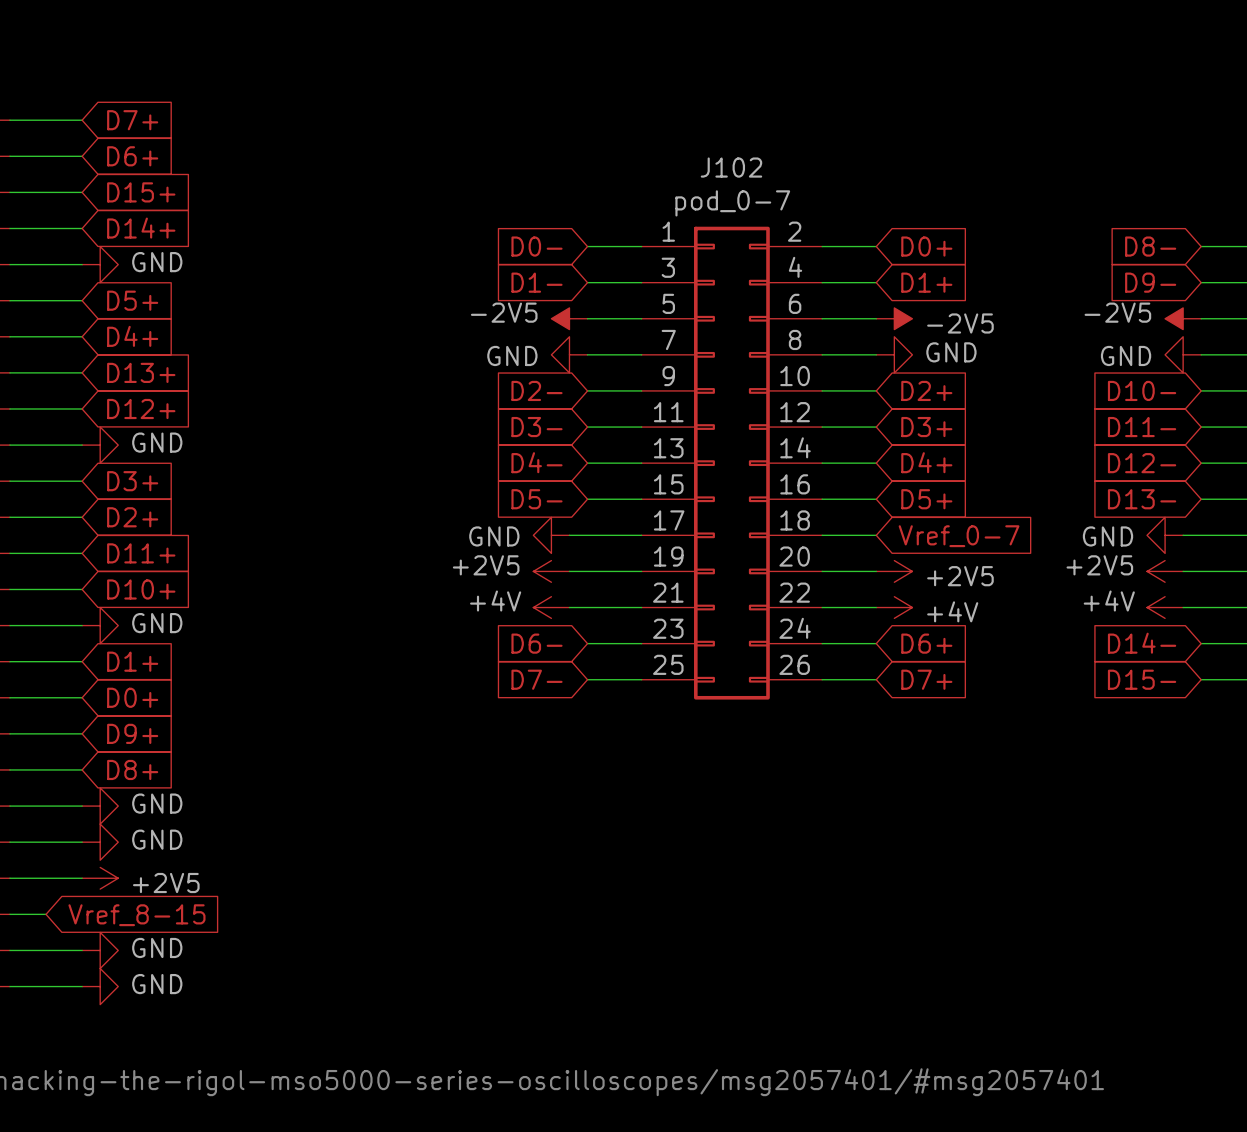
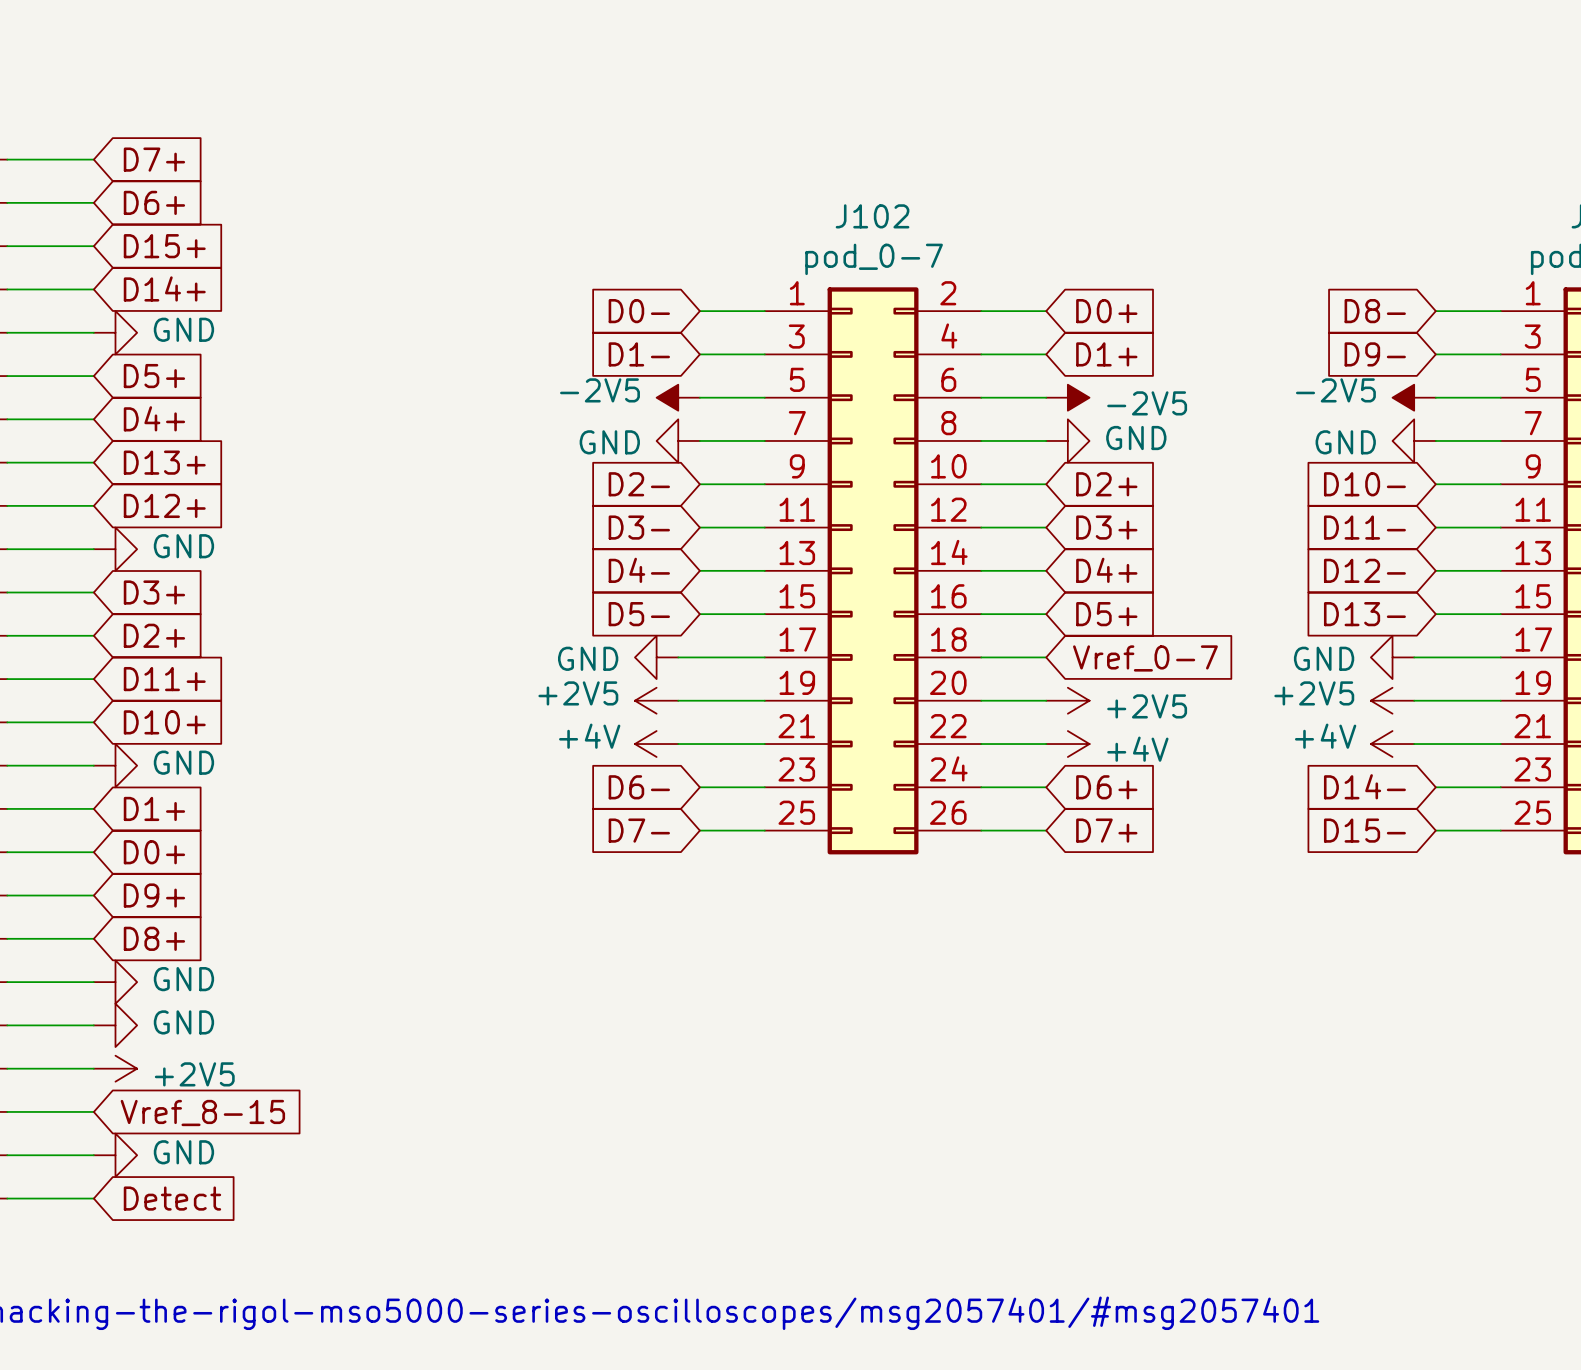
wire: none -> (50, 1111) (93, 1111)
global label position: Vref_8-15 (136, 915) -> Vref_8-15 (202, 1113)
power symbol: GND (100, 986) -> none
global label: none -> Detect (172, 1198)

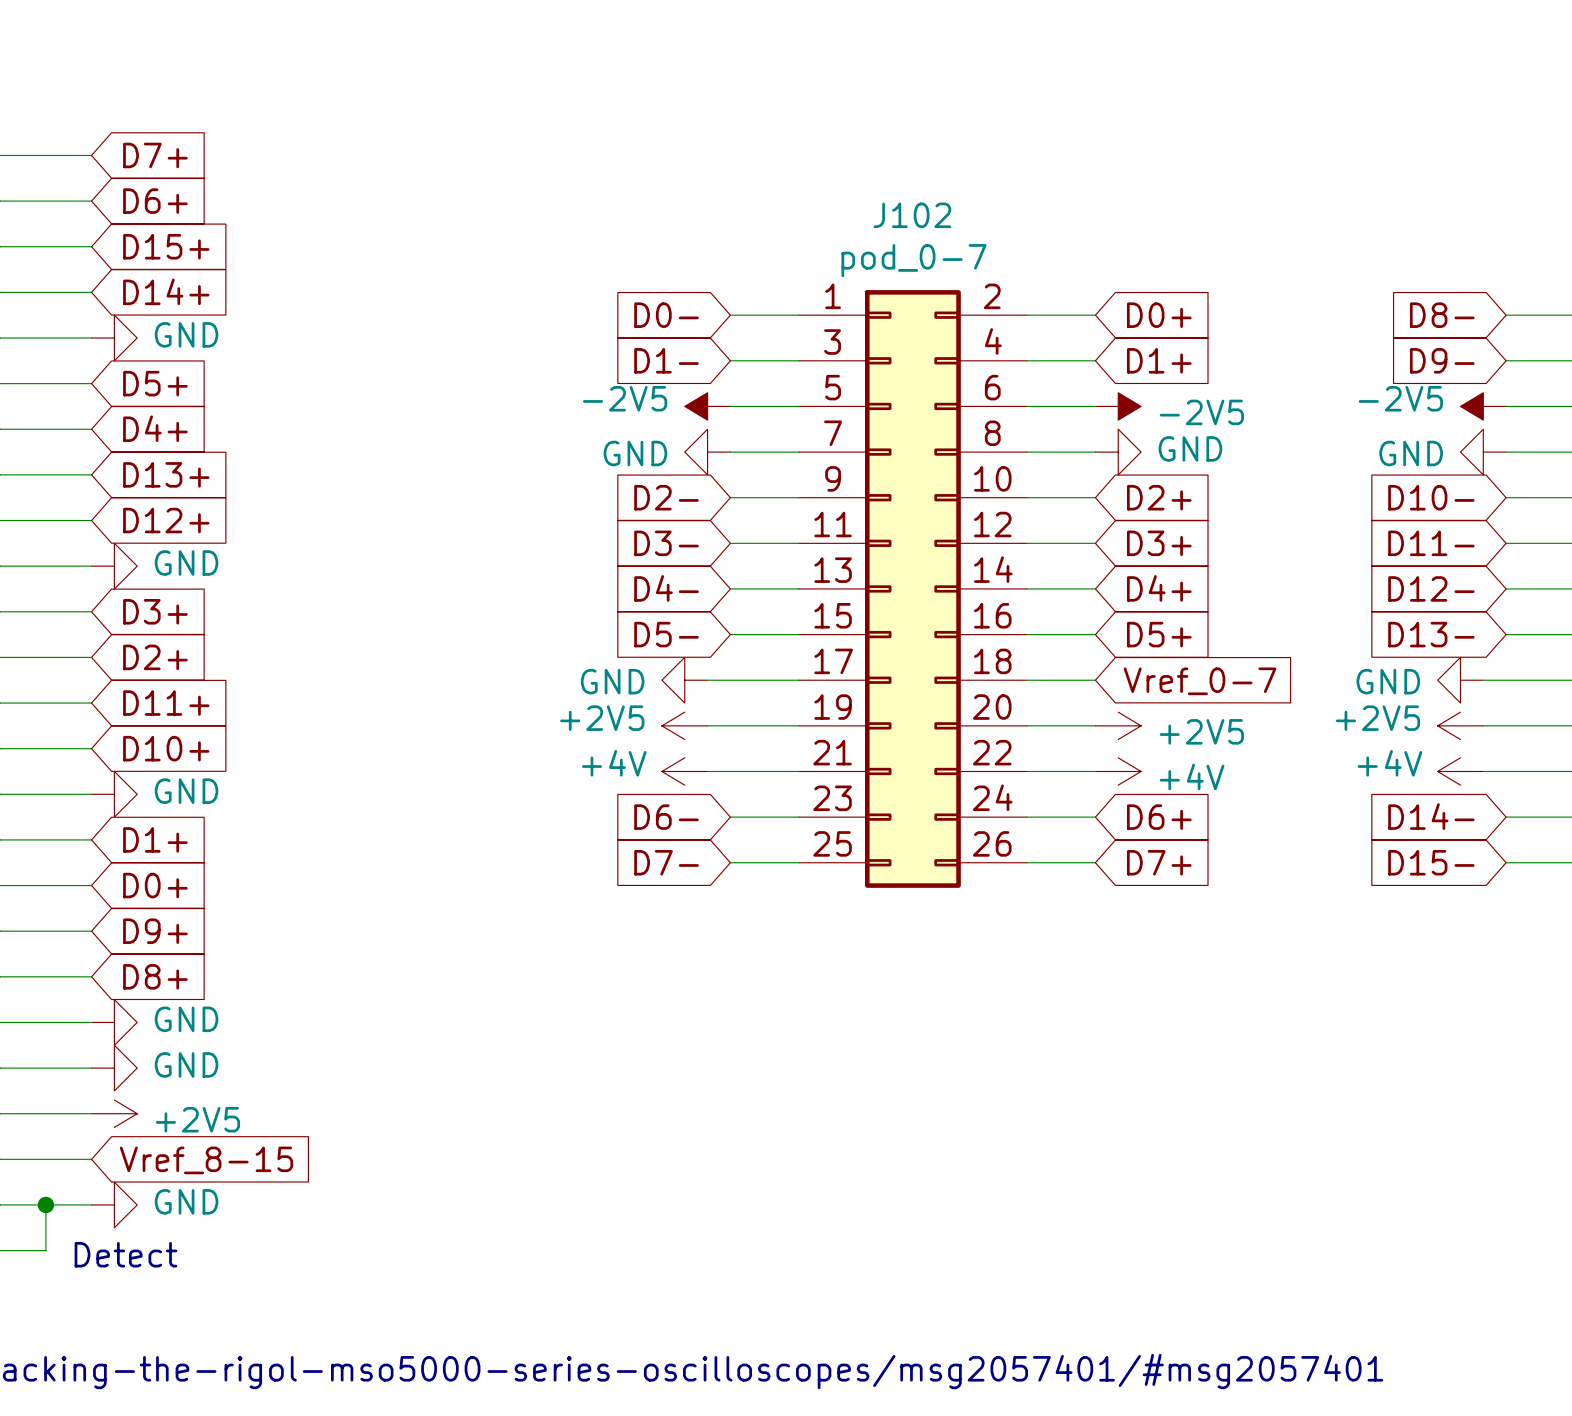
junction: none -> (45, 1204)
wire: (50, 1198) (93, 1198) -> (45, 1250) (45, 1204)
global label: Detect (172, 1198) -> none
text: none -> Detect (125, 1254)

